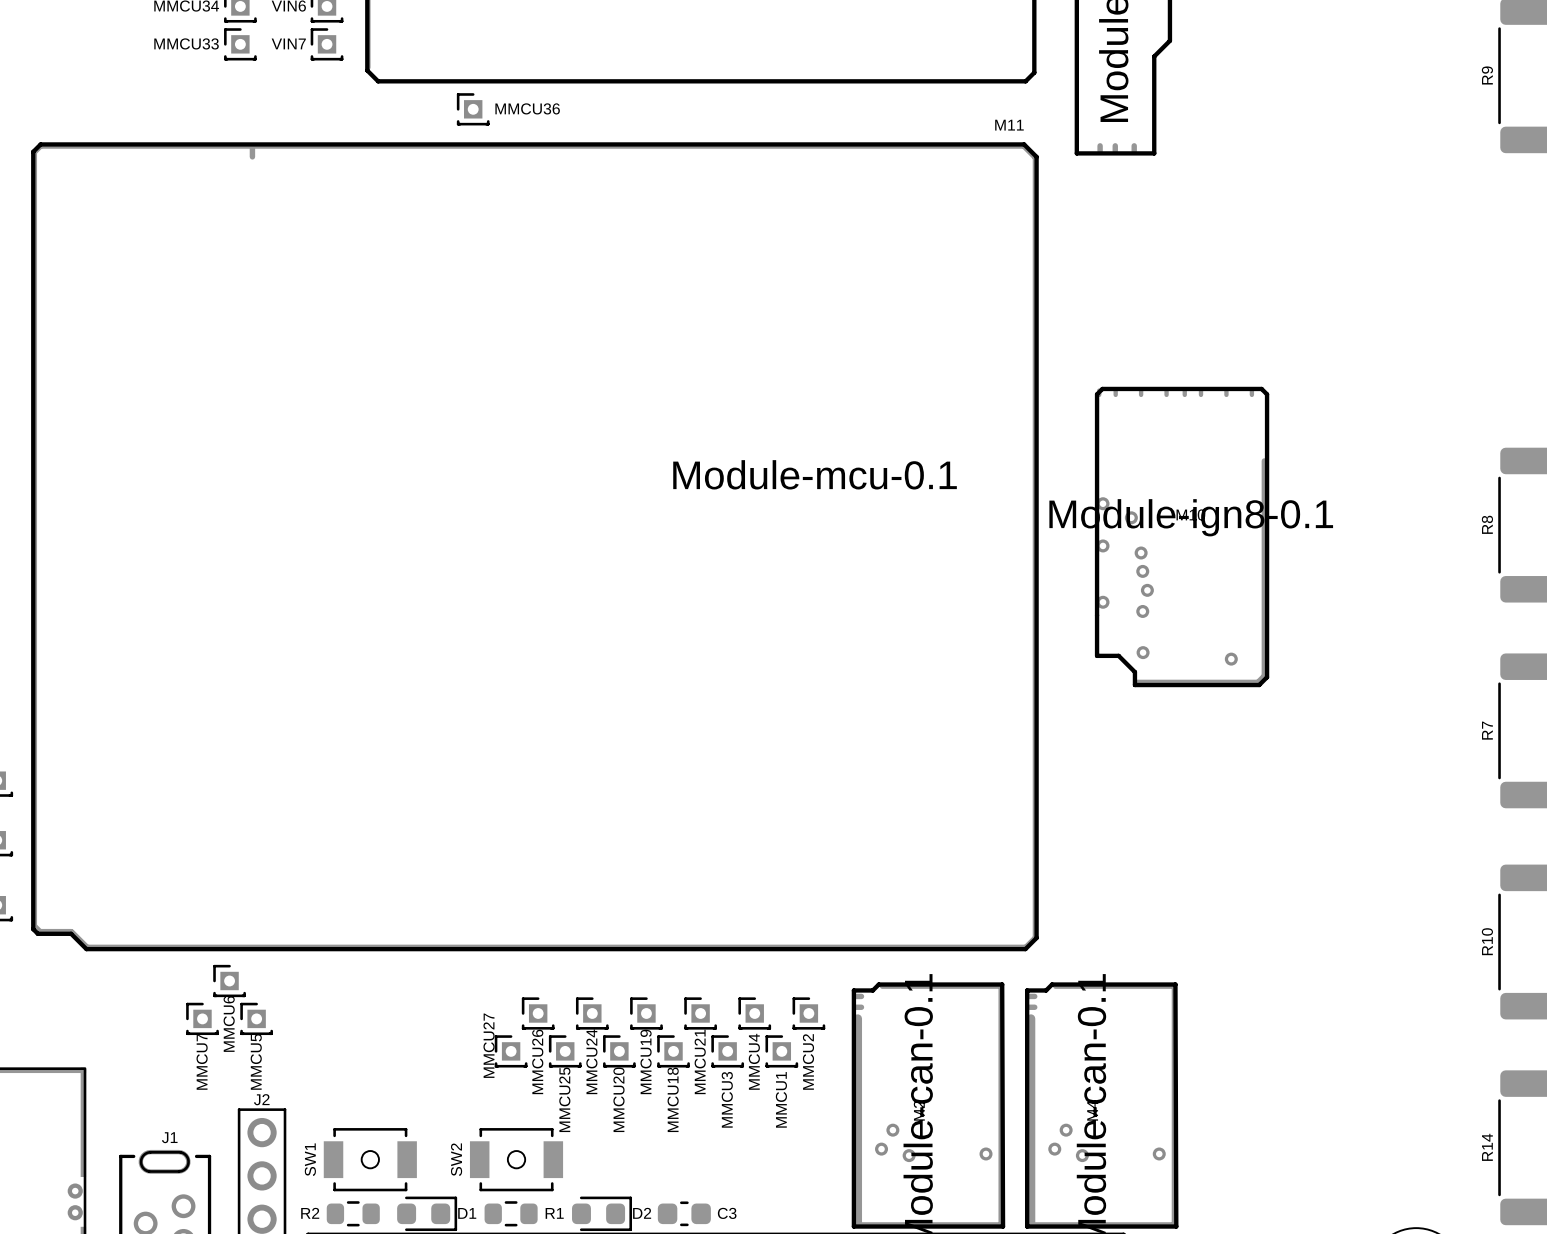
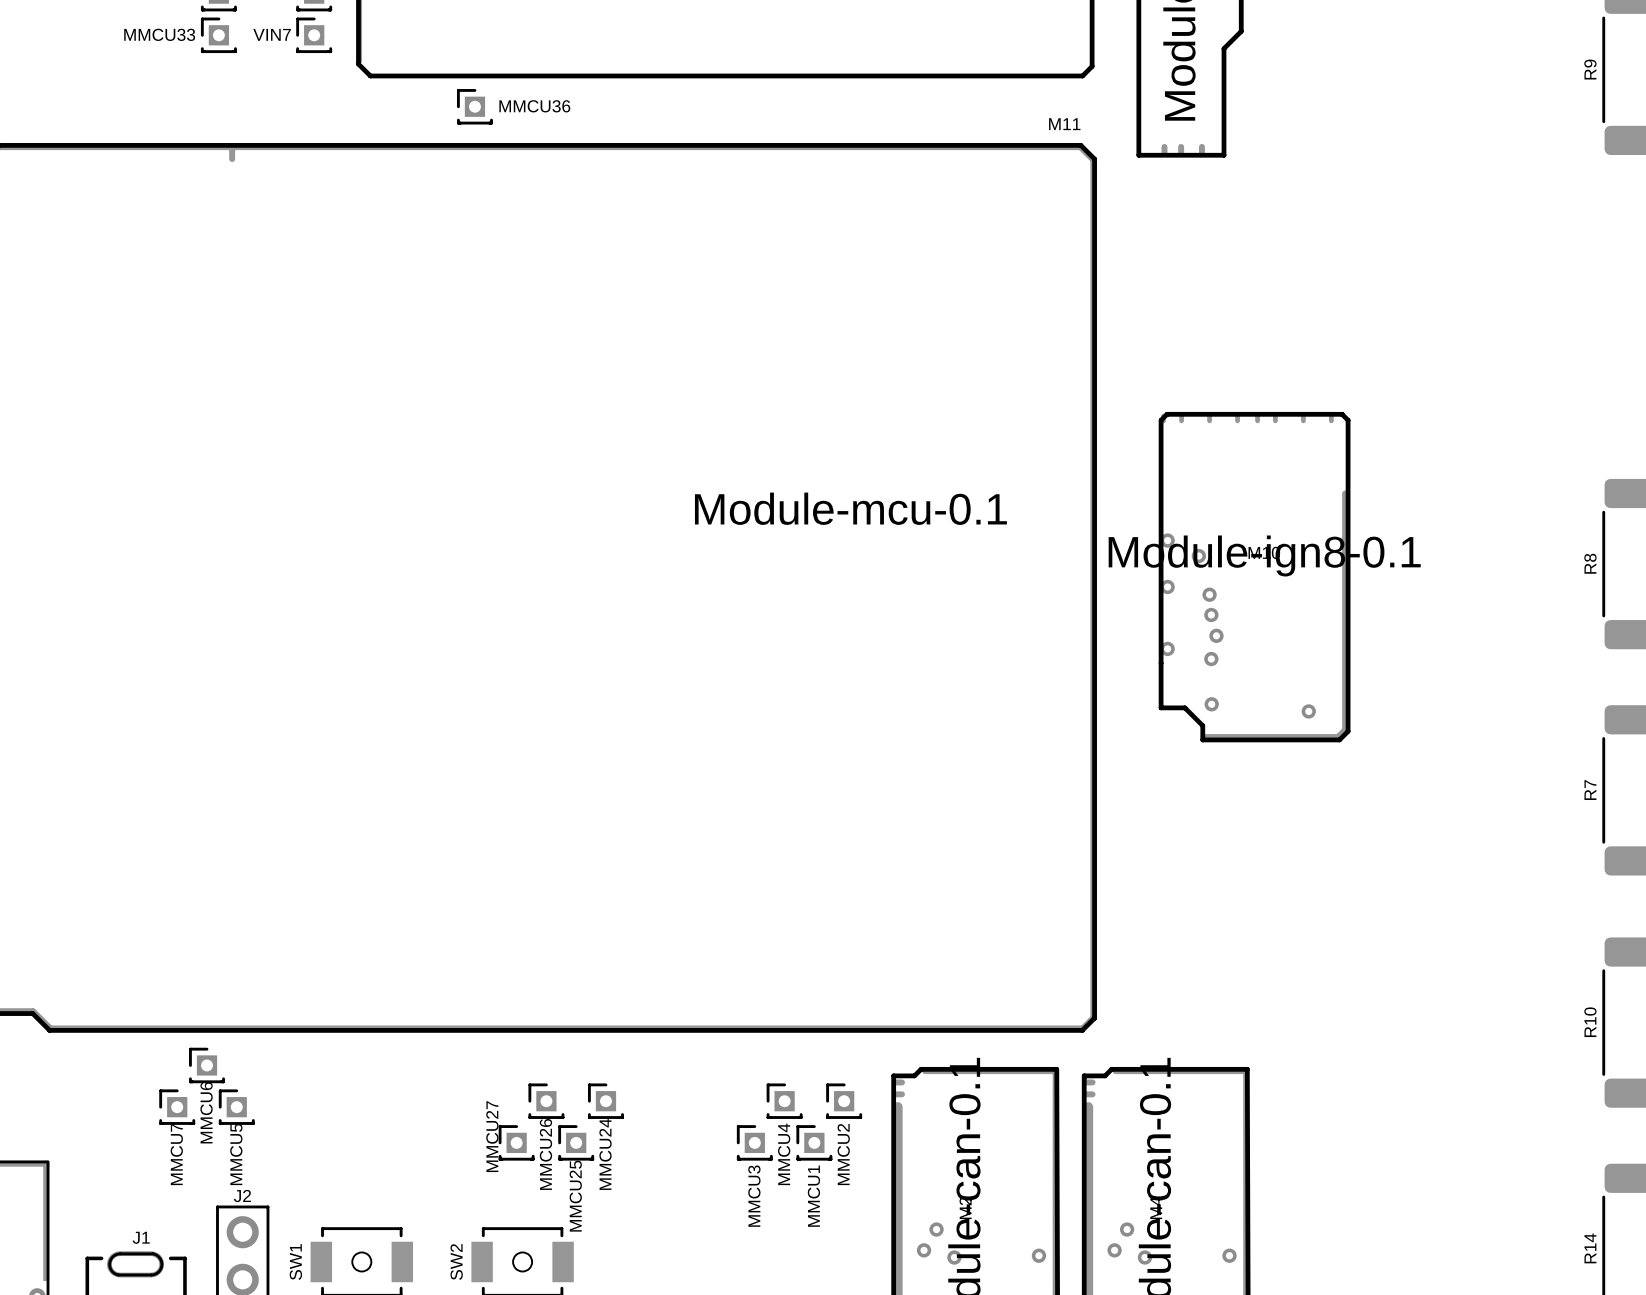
MMCU19: (646, 1013) -> none
MMCU21: (700, 1013) -> none
MMCU20: (619, 1051) -> none
MMCU18: (673, 1051) -> none

